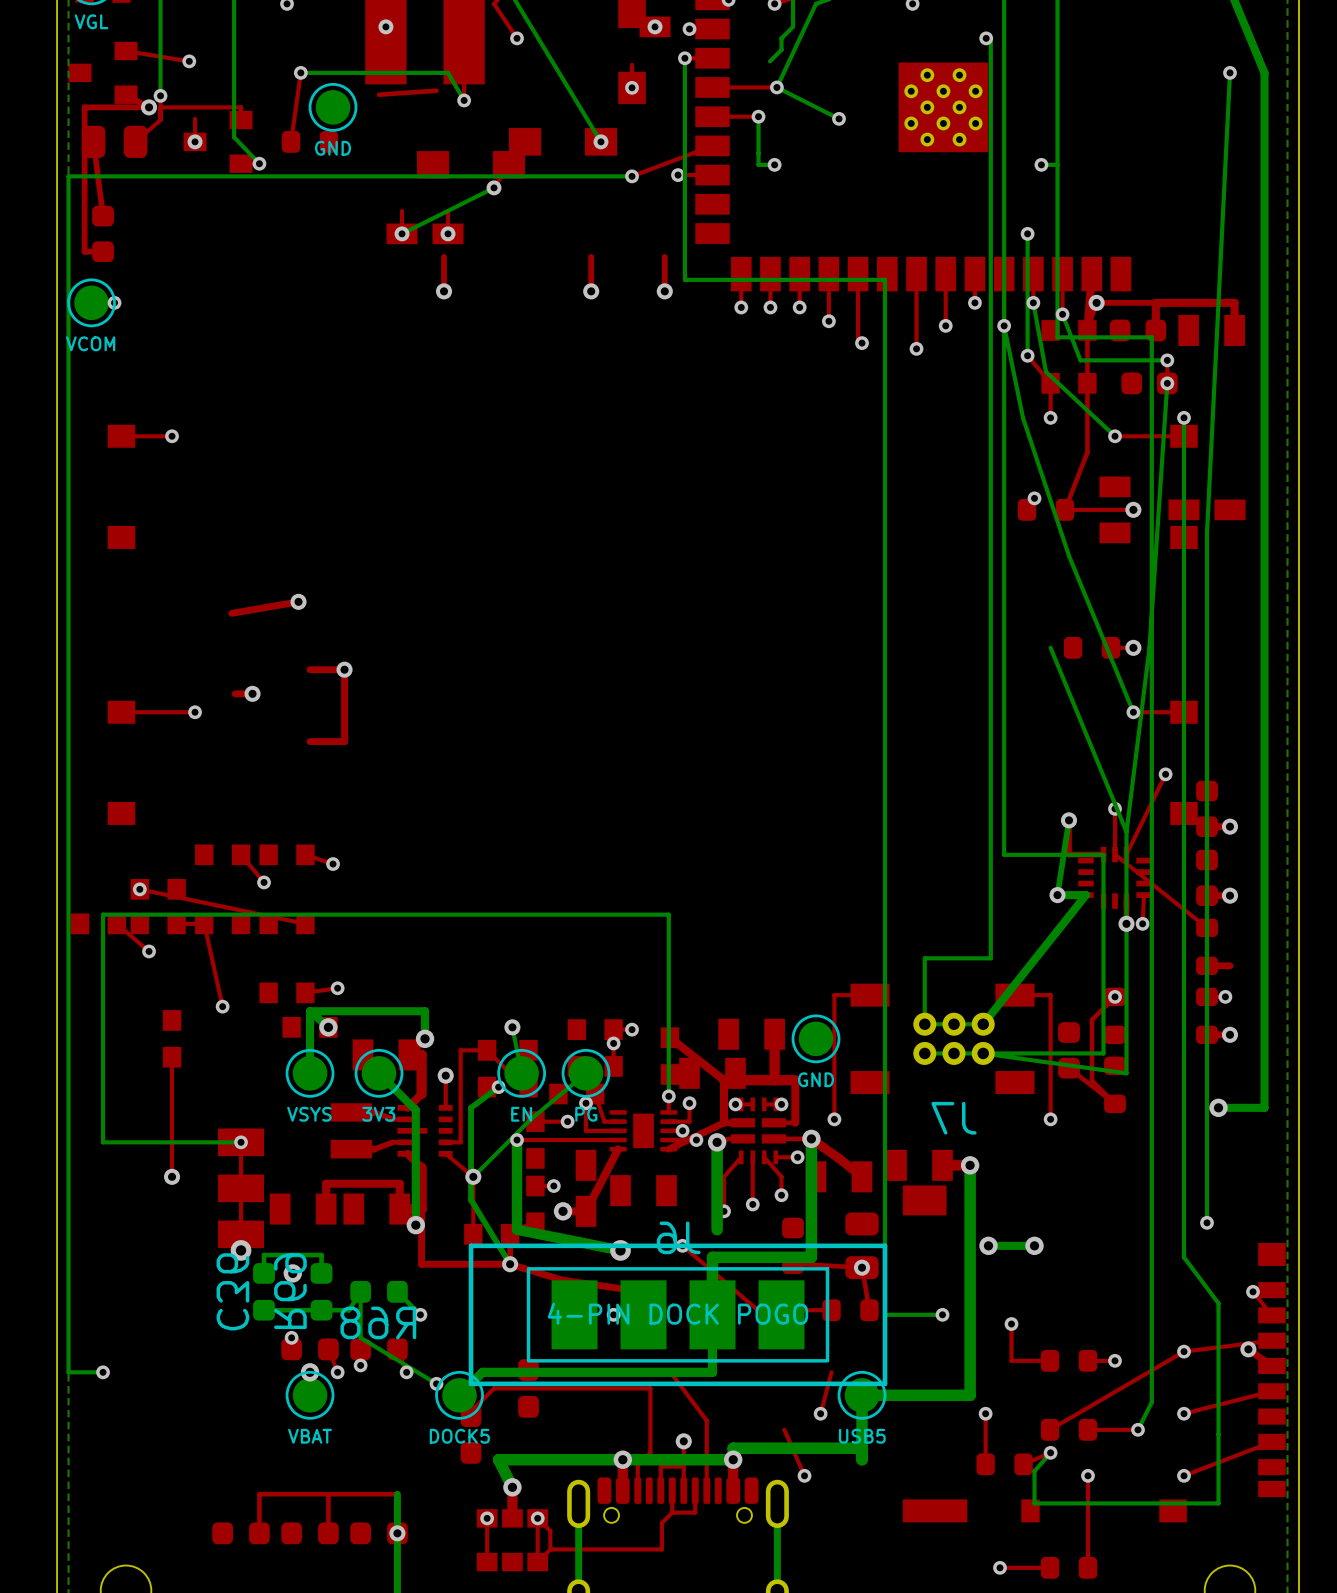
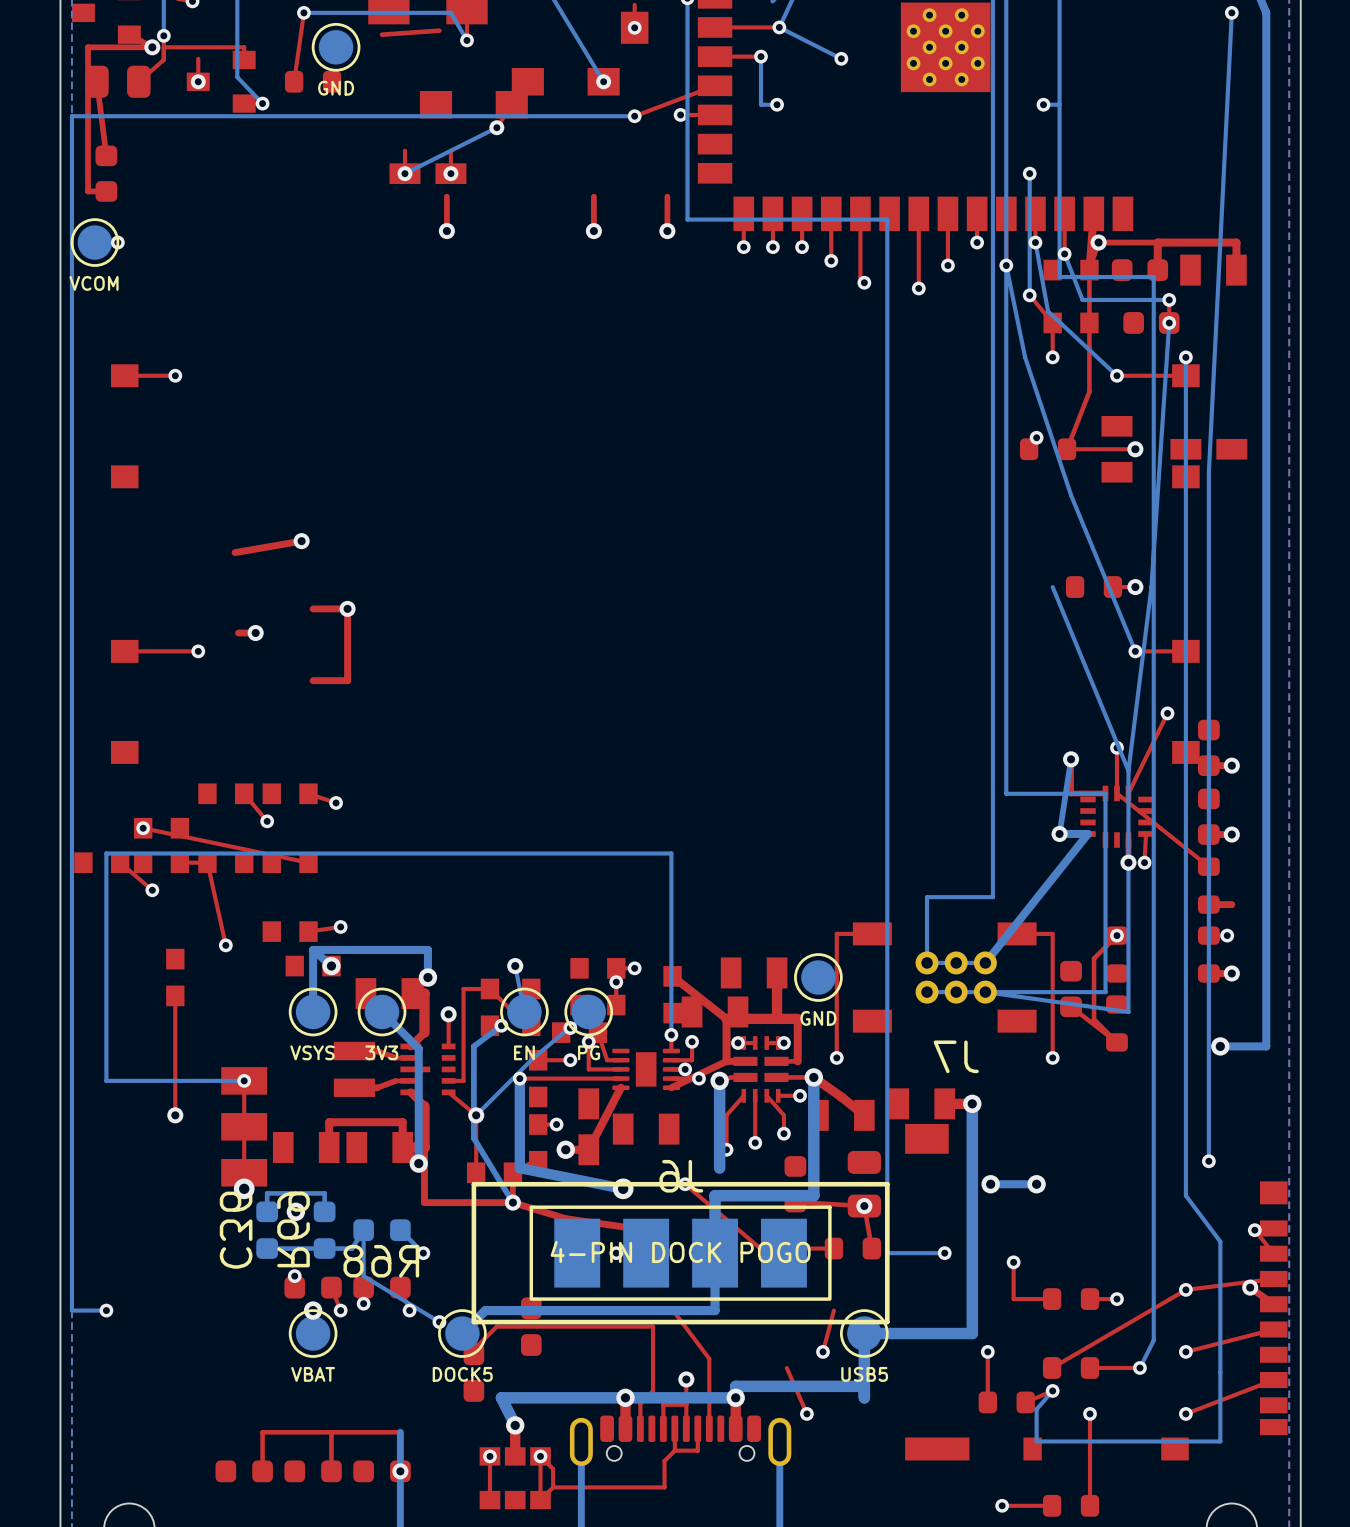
via: none -> (570, 1028)

